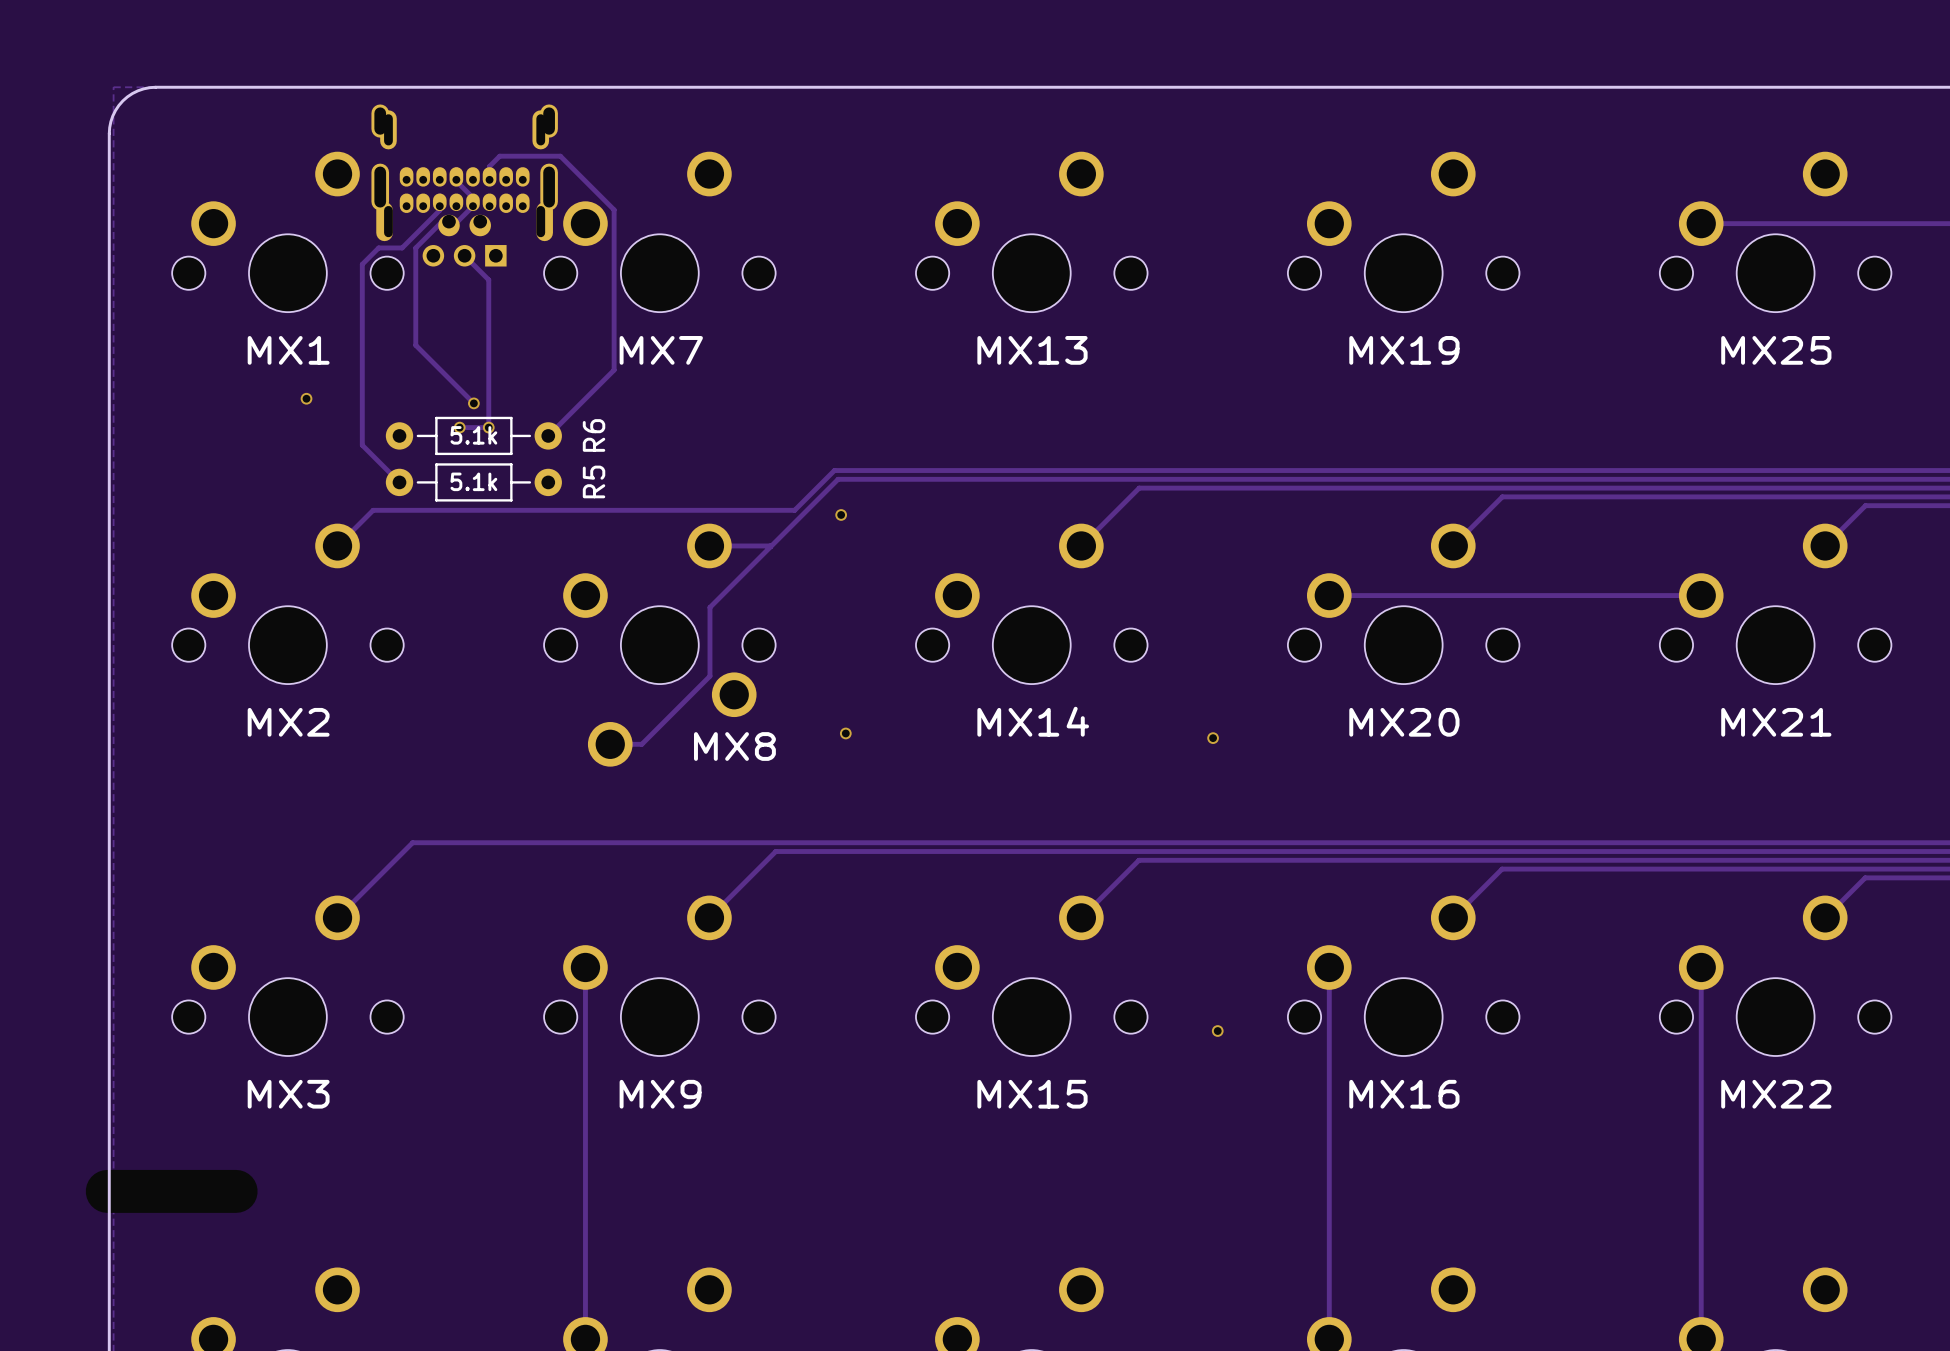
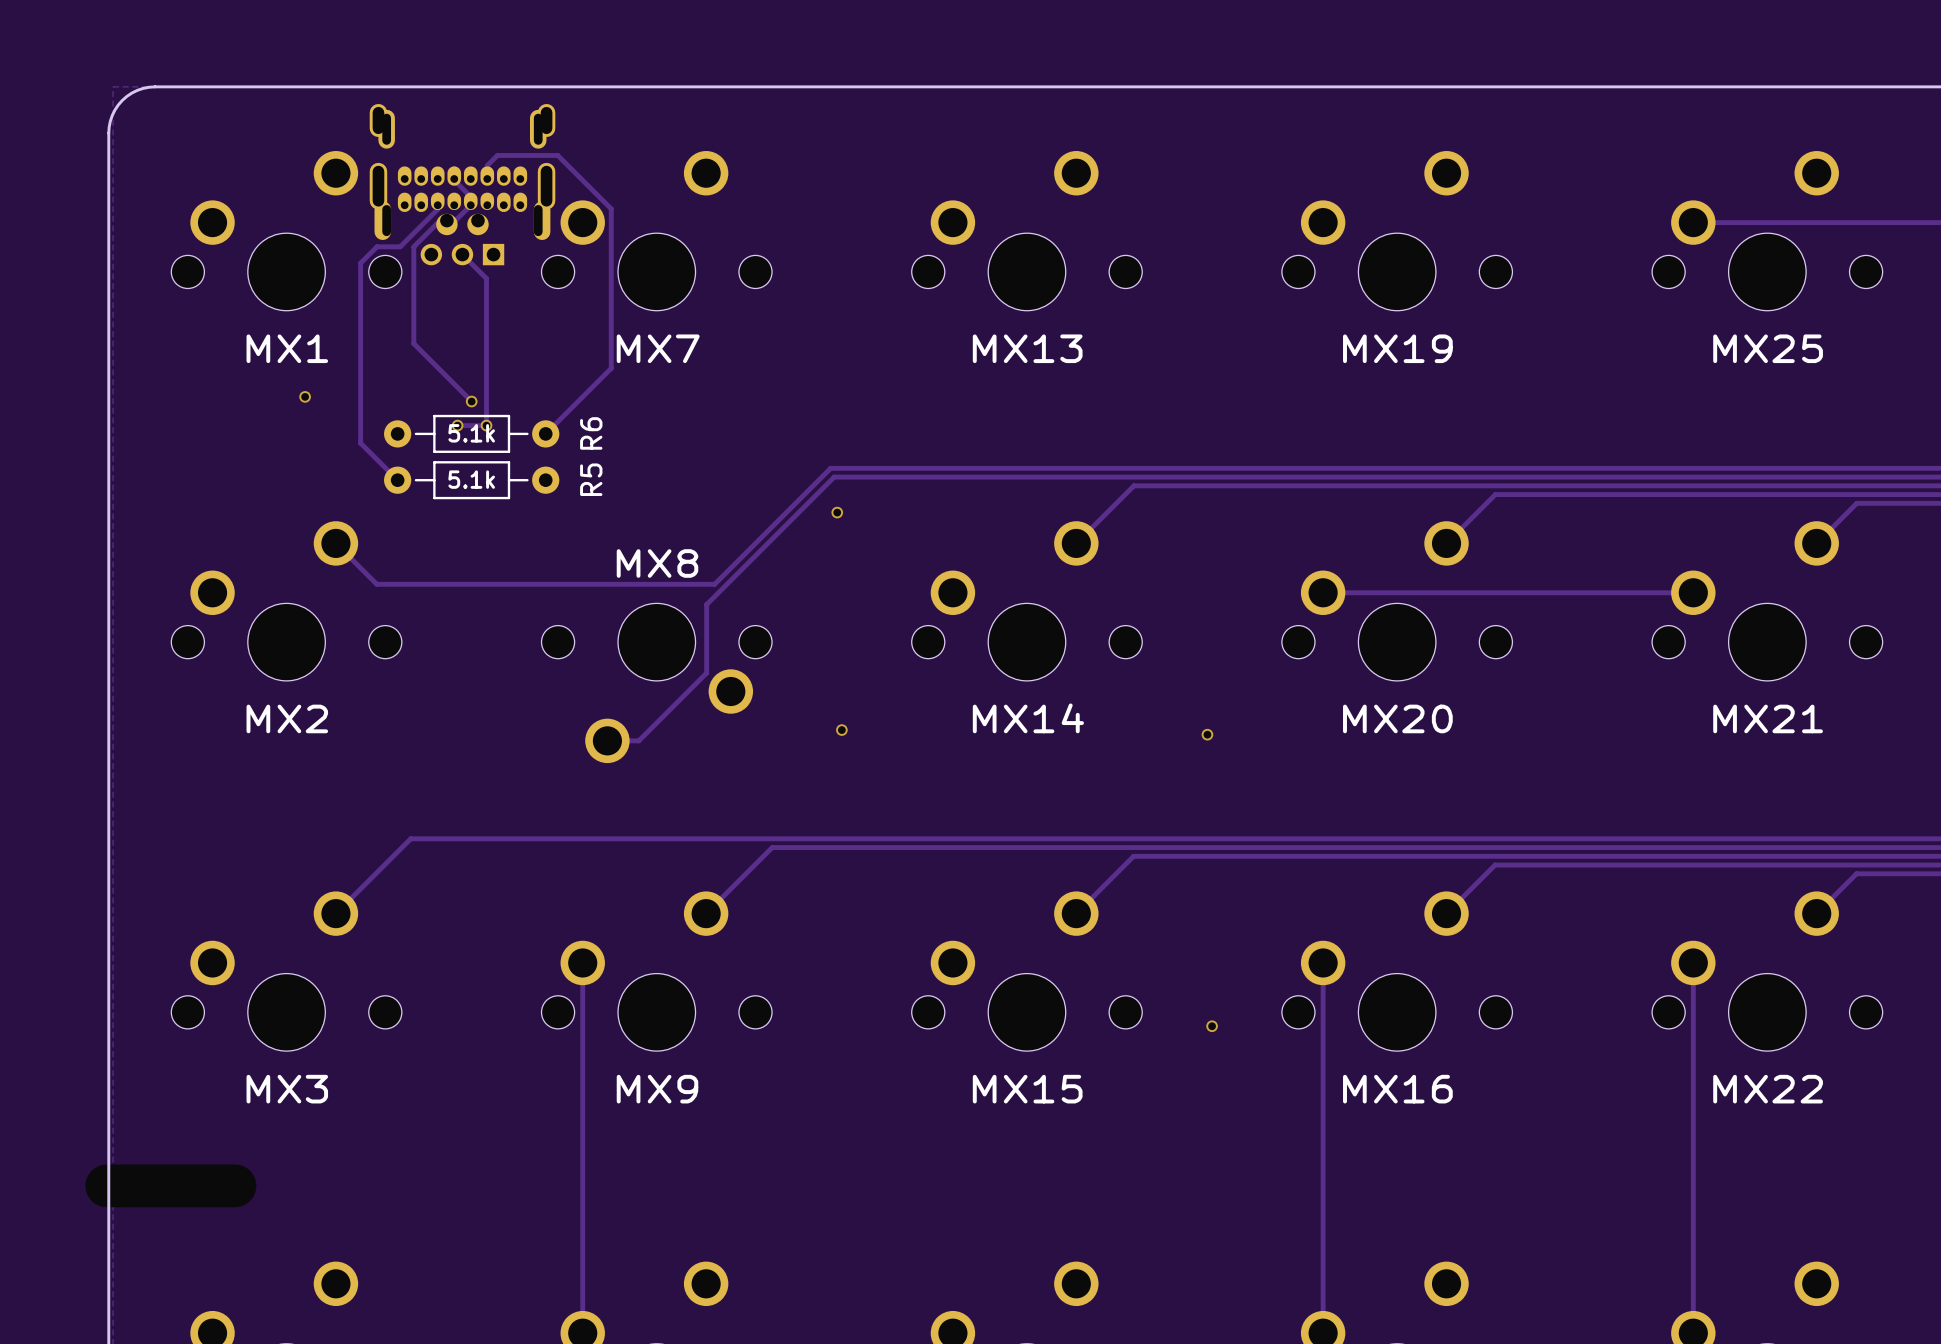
track: (794, 510) (373, 510) (337, 545) -> (790, 507) (714, 584) (376, 584) (335, 543)
MX8 footprint: [544, 523, 776, 767] -> [541, 603, 773, 764]
track: (709, 545) (770, 546) -> none
MX8 name position: MX8 (734, 746) -> MX8 (657, 563)

